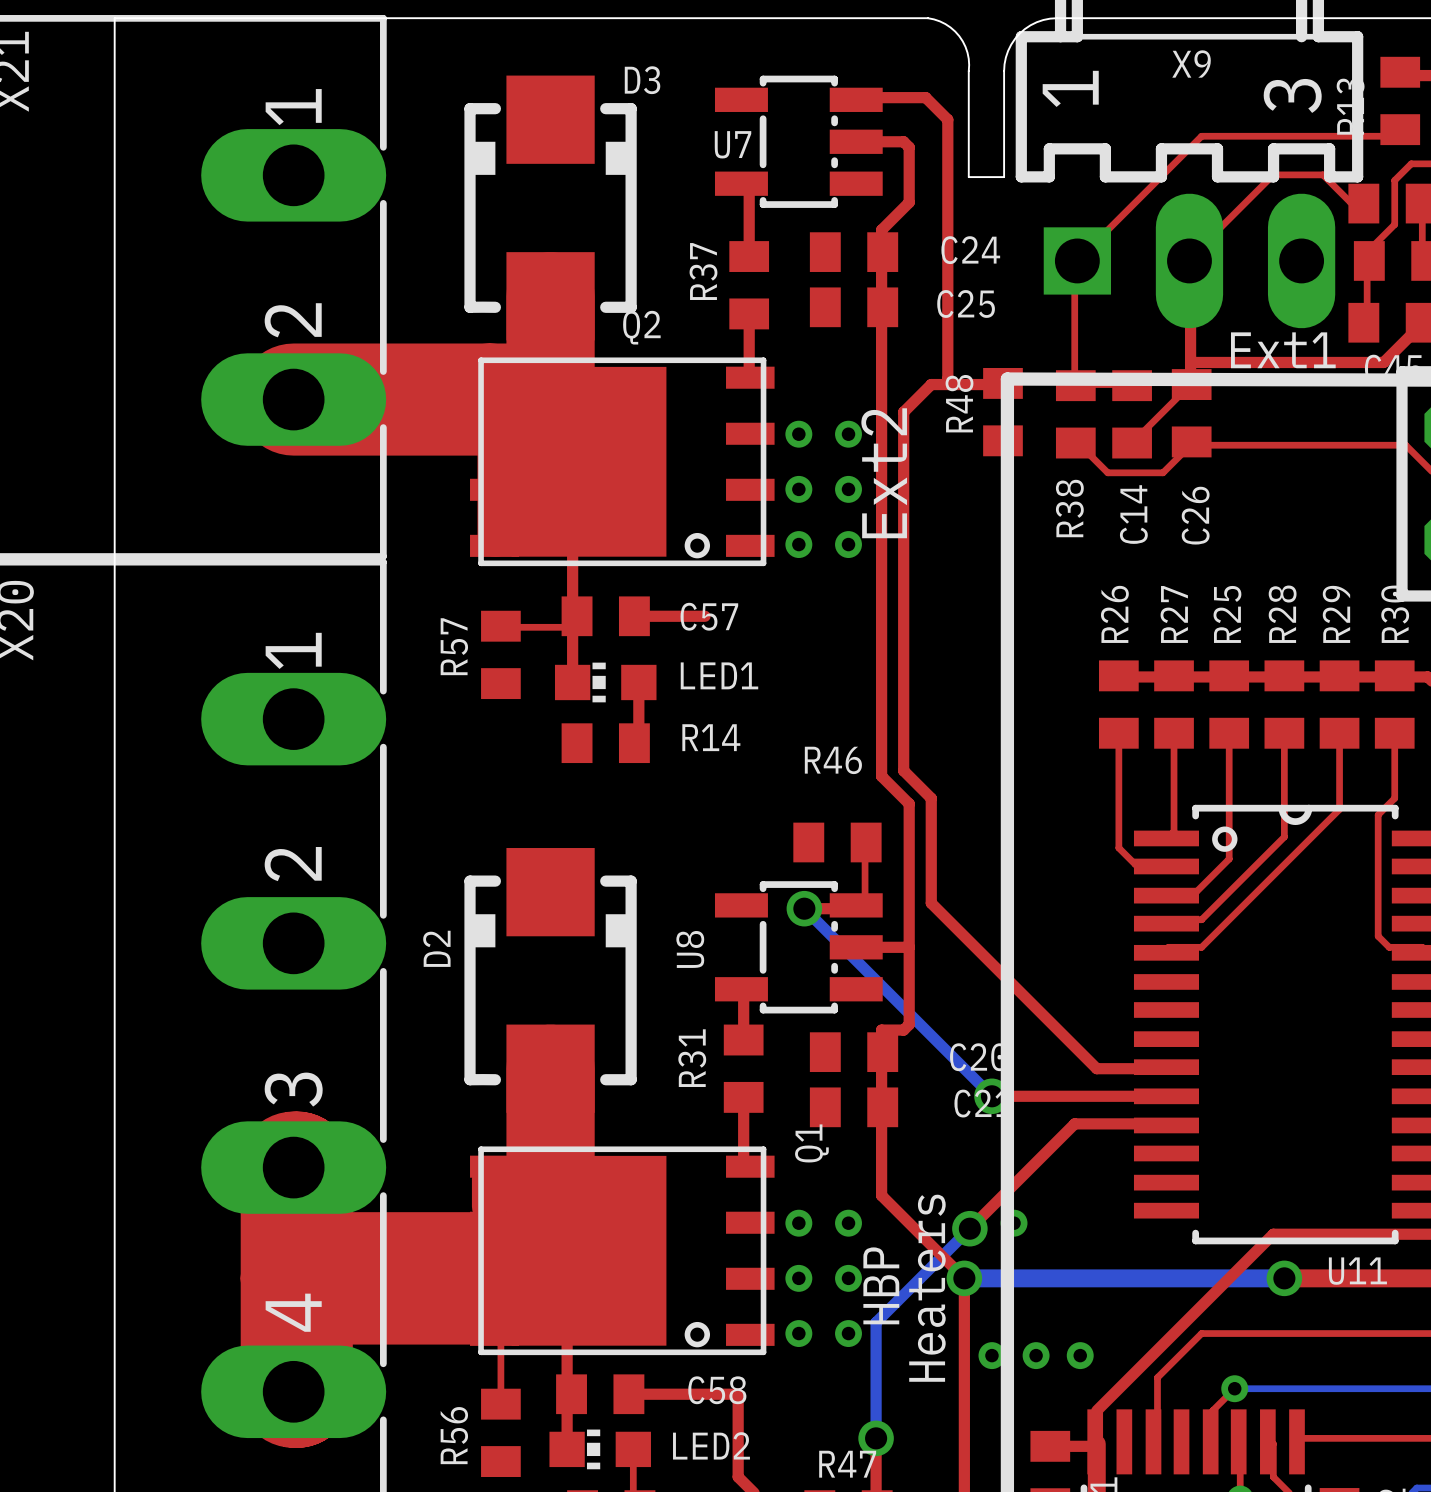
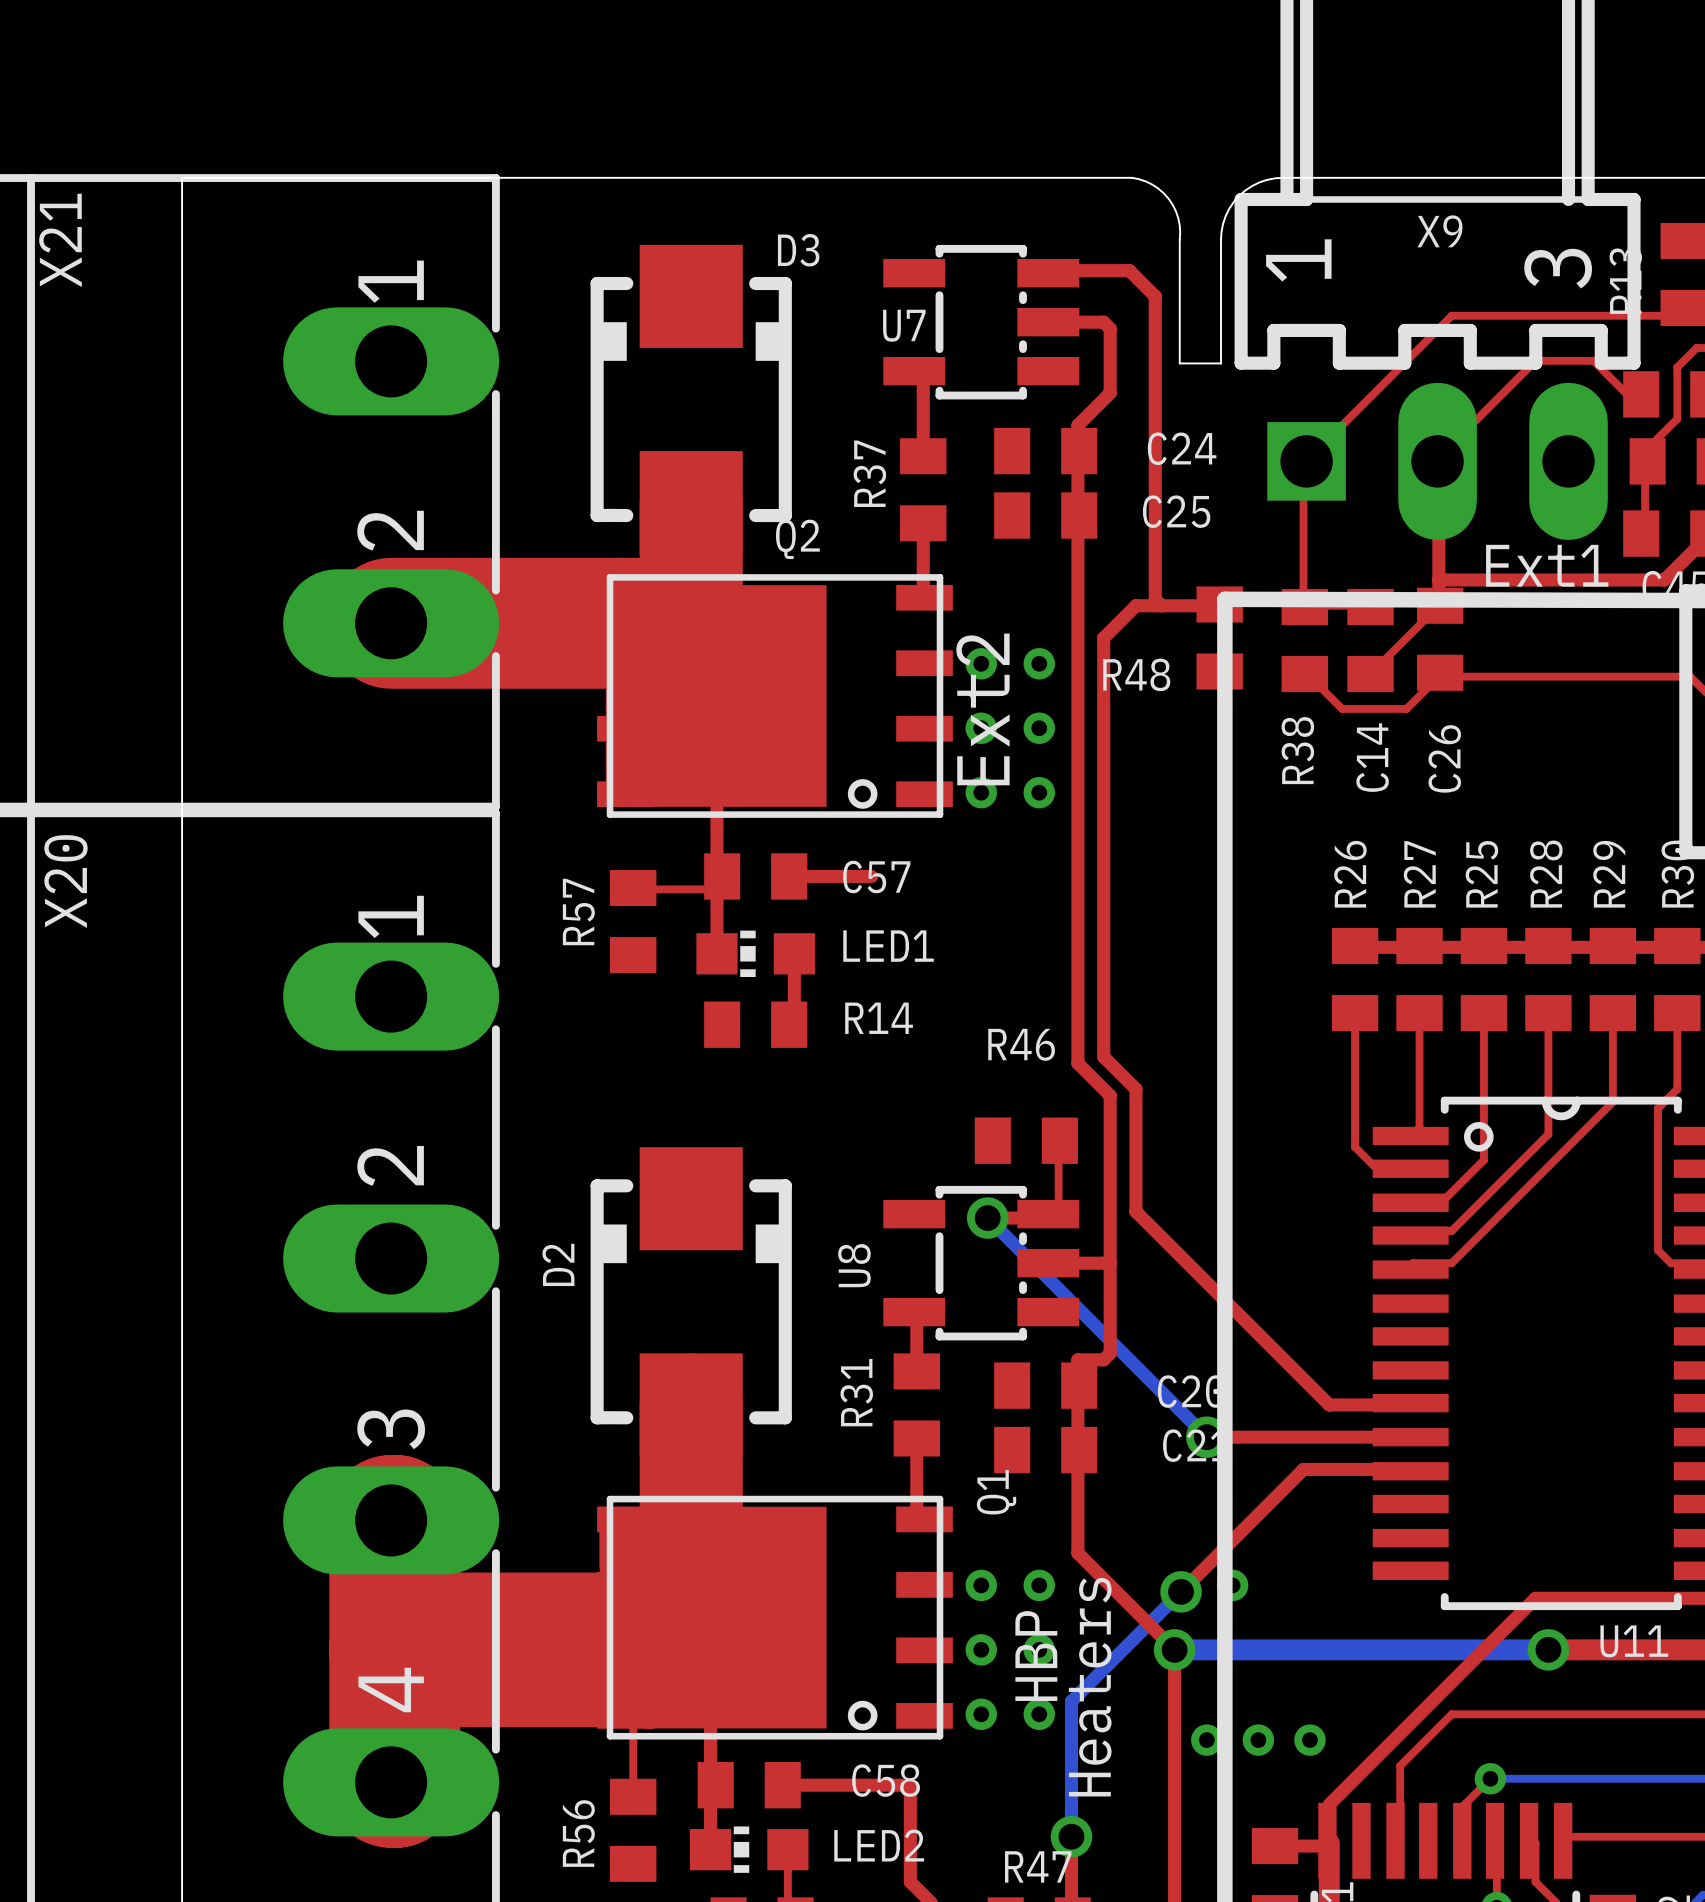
R48 name rotation: 0° (959, 403) -> 90° clockwise (1136, 674)
text position: Ext2 (884, 473) -> Ext2 (982, 709)
text position: HBP (881, 1285) -> HBP (1036, 1656)
text position: Heaters (927, 1288) -> Heaters (1090, 1687)

